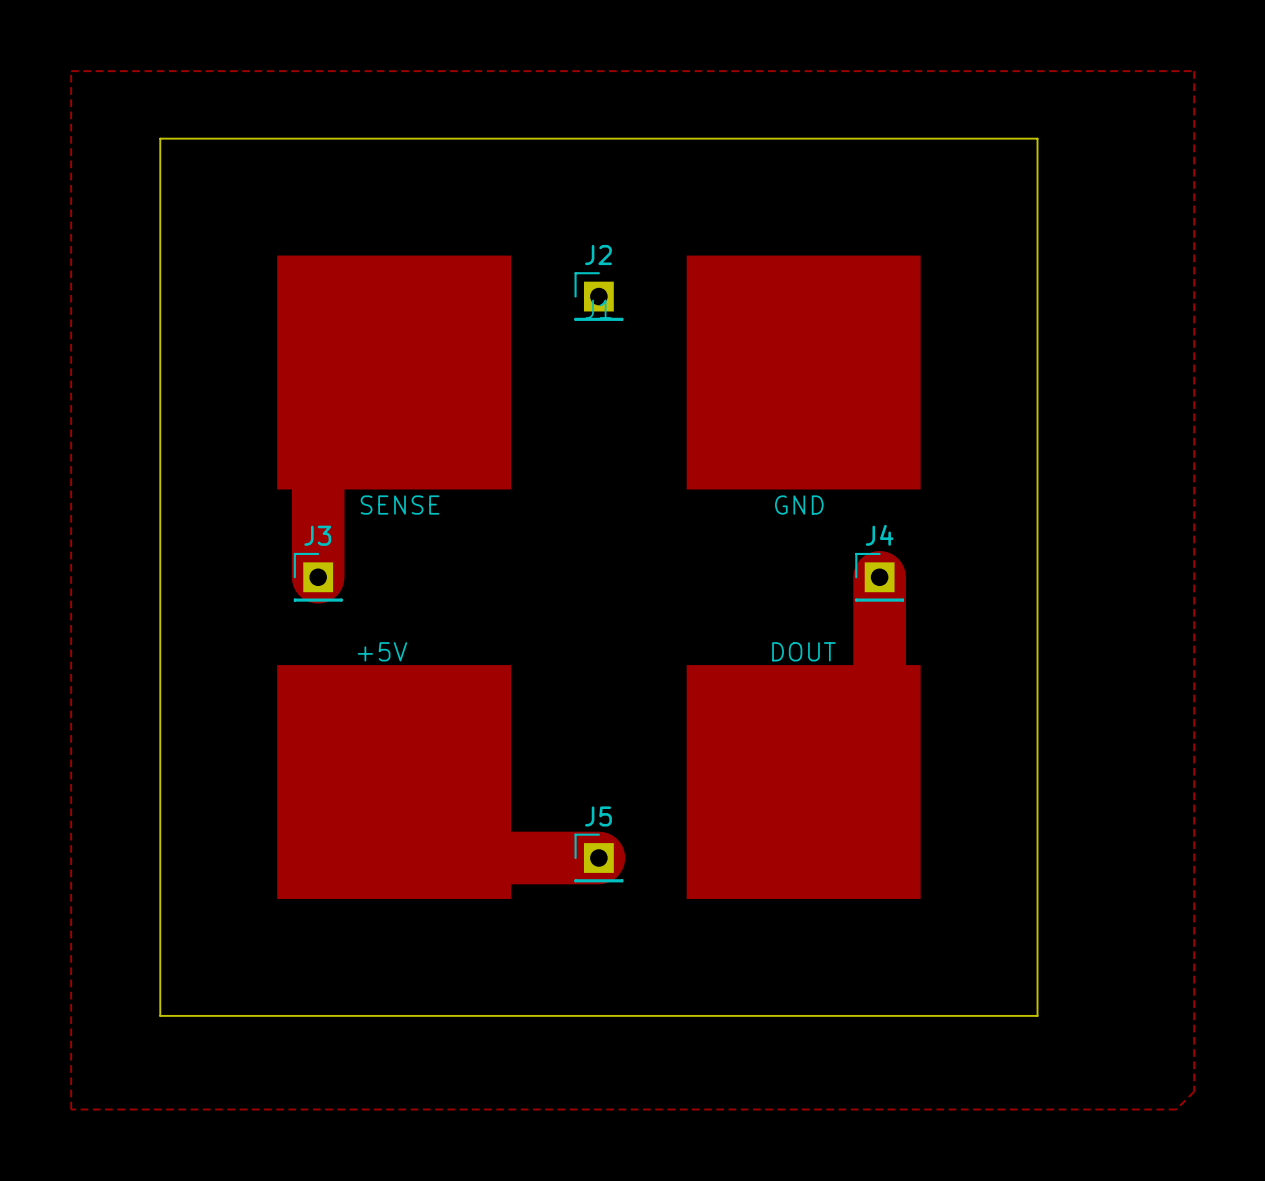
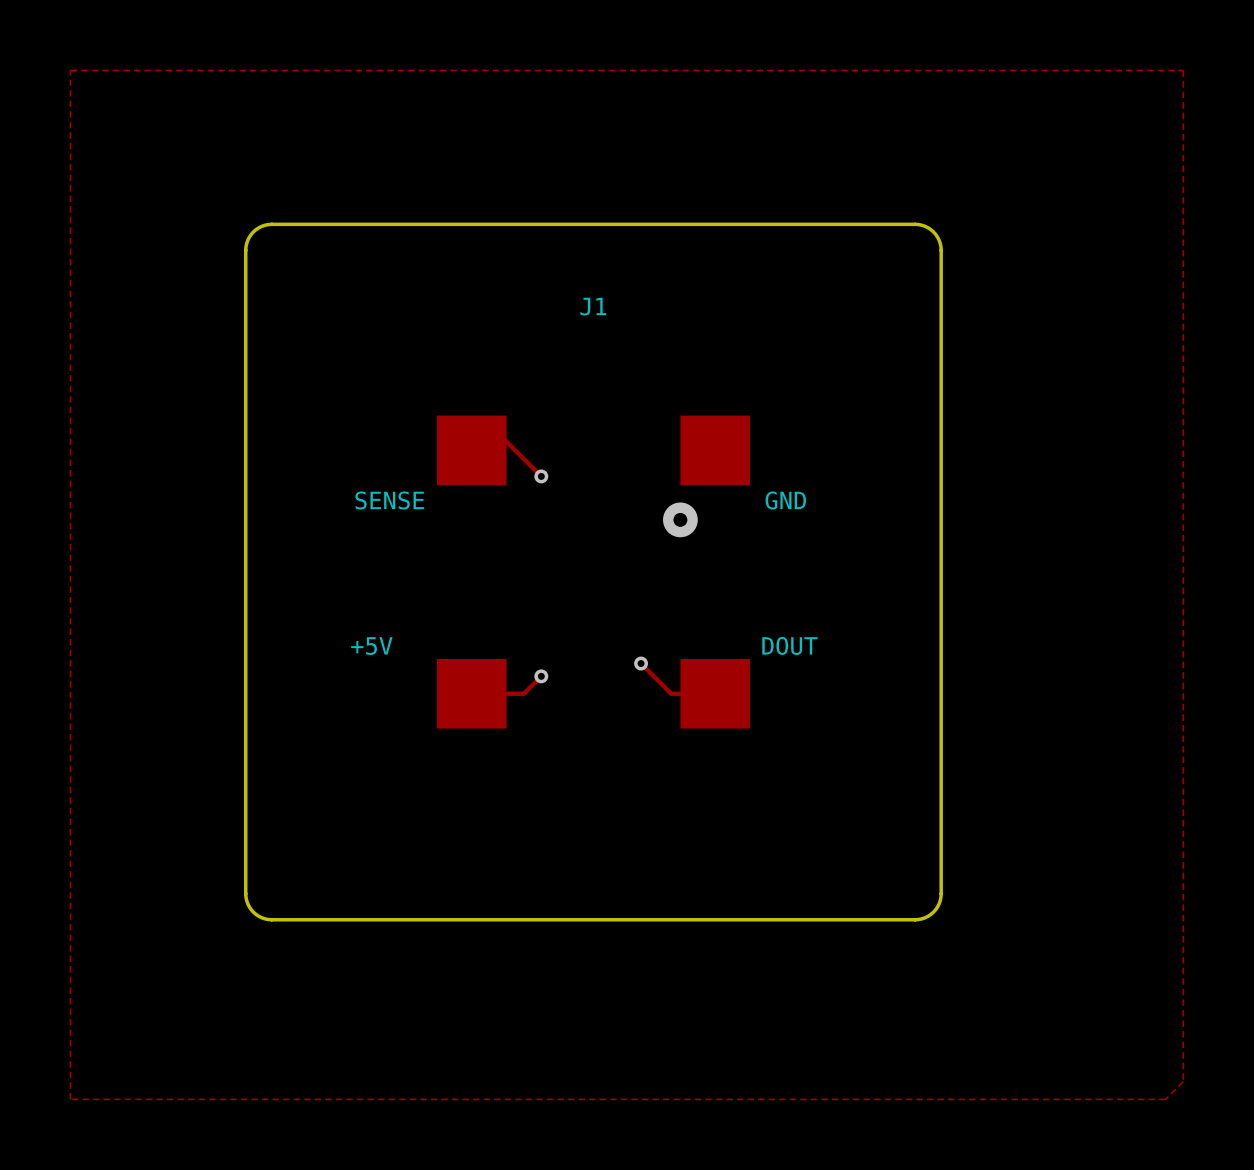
board edge: (160, 138) (1037, 138) (1037, 1015) (160, 1015) (160, 138) -> (271, 224) (261, 226) (253, 231) (247, 240) (245, 250) (245, 893) (247, 903) (253, 912) (261, 917) (271, 919) (915, 919) (925, 917) (933, 912) (939, 903) (941, 893) (941, 250) (939, 240) (933, 231) (925, 226) (915, 224) (271, 224)
J1 footprint: [277, 255, 921, 899] -> [436, 415, 750, 729]
J2: (598, 296) -> none
track: (394, 372) (318, 448) (318, 577) -> none
track: none -> (463, 441) (506, 441) (541, 476)
via: none -> (541, 476)
via: none -> (680, 519)
J3: (318, 577) -> none
track: (879, 577) (879, 706) (803, 782) -> none
J4: (879, 577) -> none
track: none -> (641, 663) (671, 693) (715, 693)
via: none -> (641, 663)
track: none -> (541, 676) (523, 693) (471, 693)
via: none -> (541, 676)
track: (394, 782) (470, 858) (598, 858) -> none
J5: (598, 858) -> none

